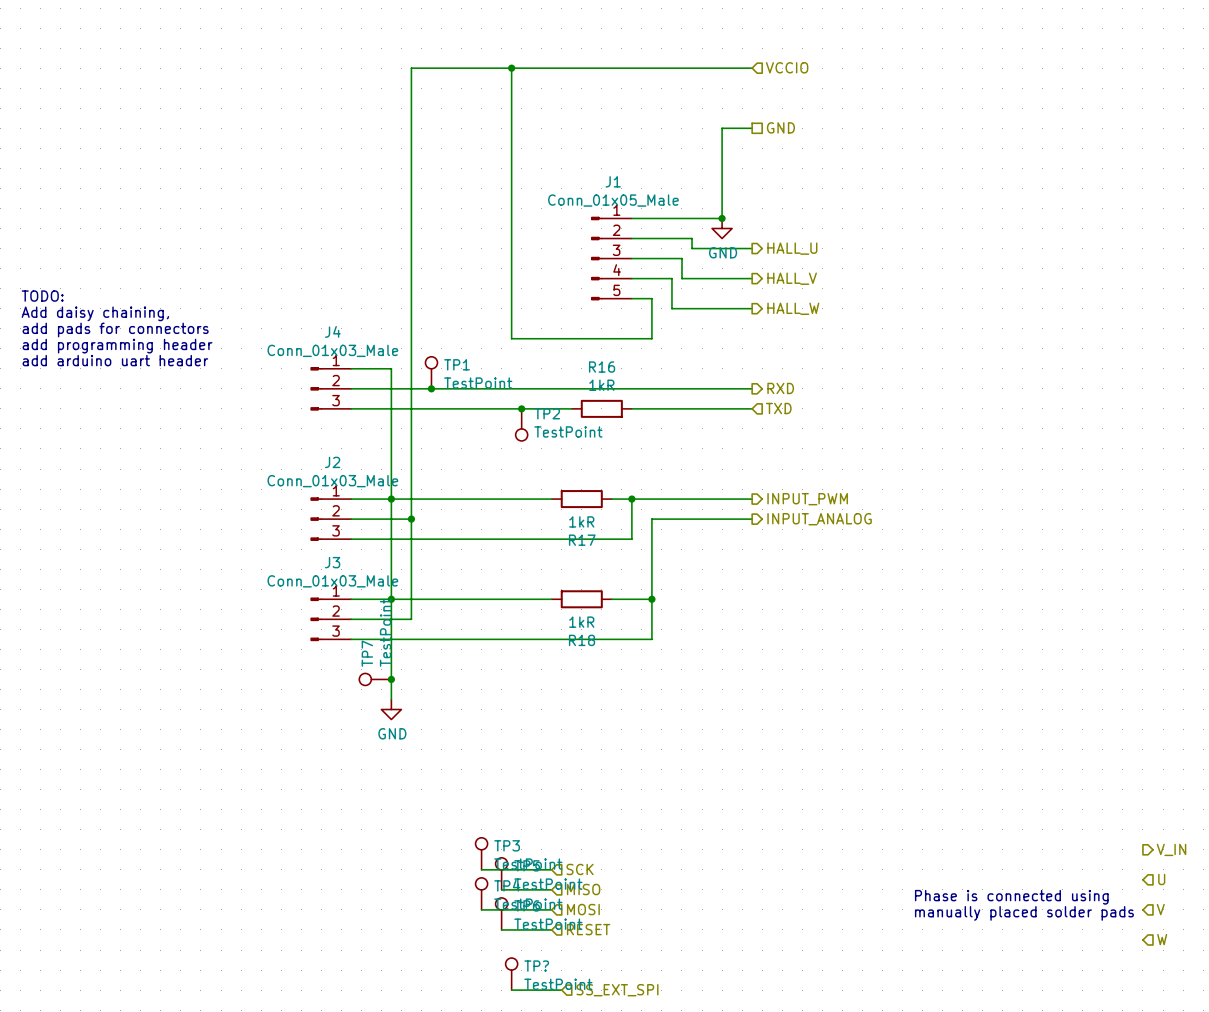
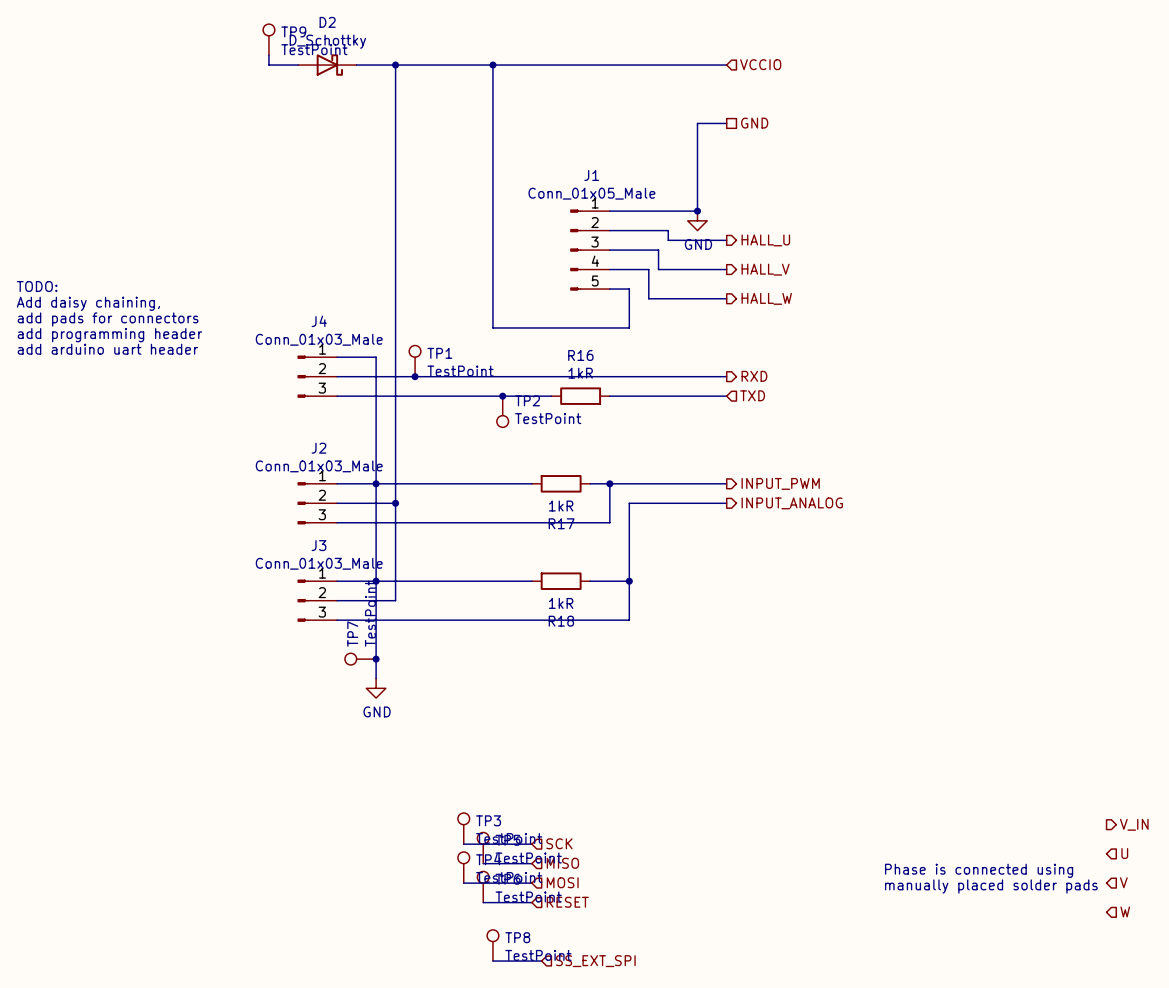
TP9: none -> TestPoint (268, 39)
wire: none -> (268, 55) (268, 65) (298, 65)
D2: none -> D_Schottky (327, 65)
wire: none -> (356, 65) (395, 65)
junction: none -> (395, 65)
TP? name: TP? (536, 966) -> TP8 (517, 937)

